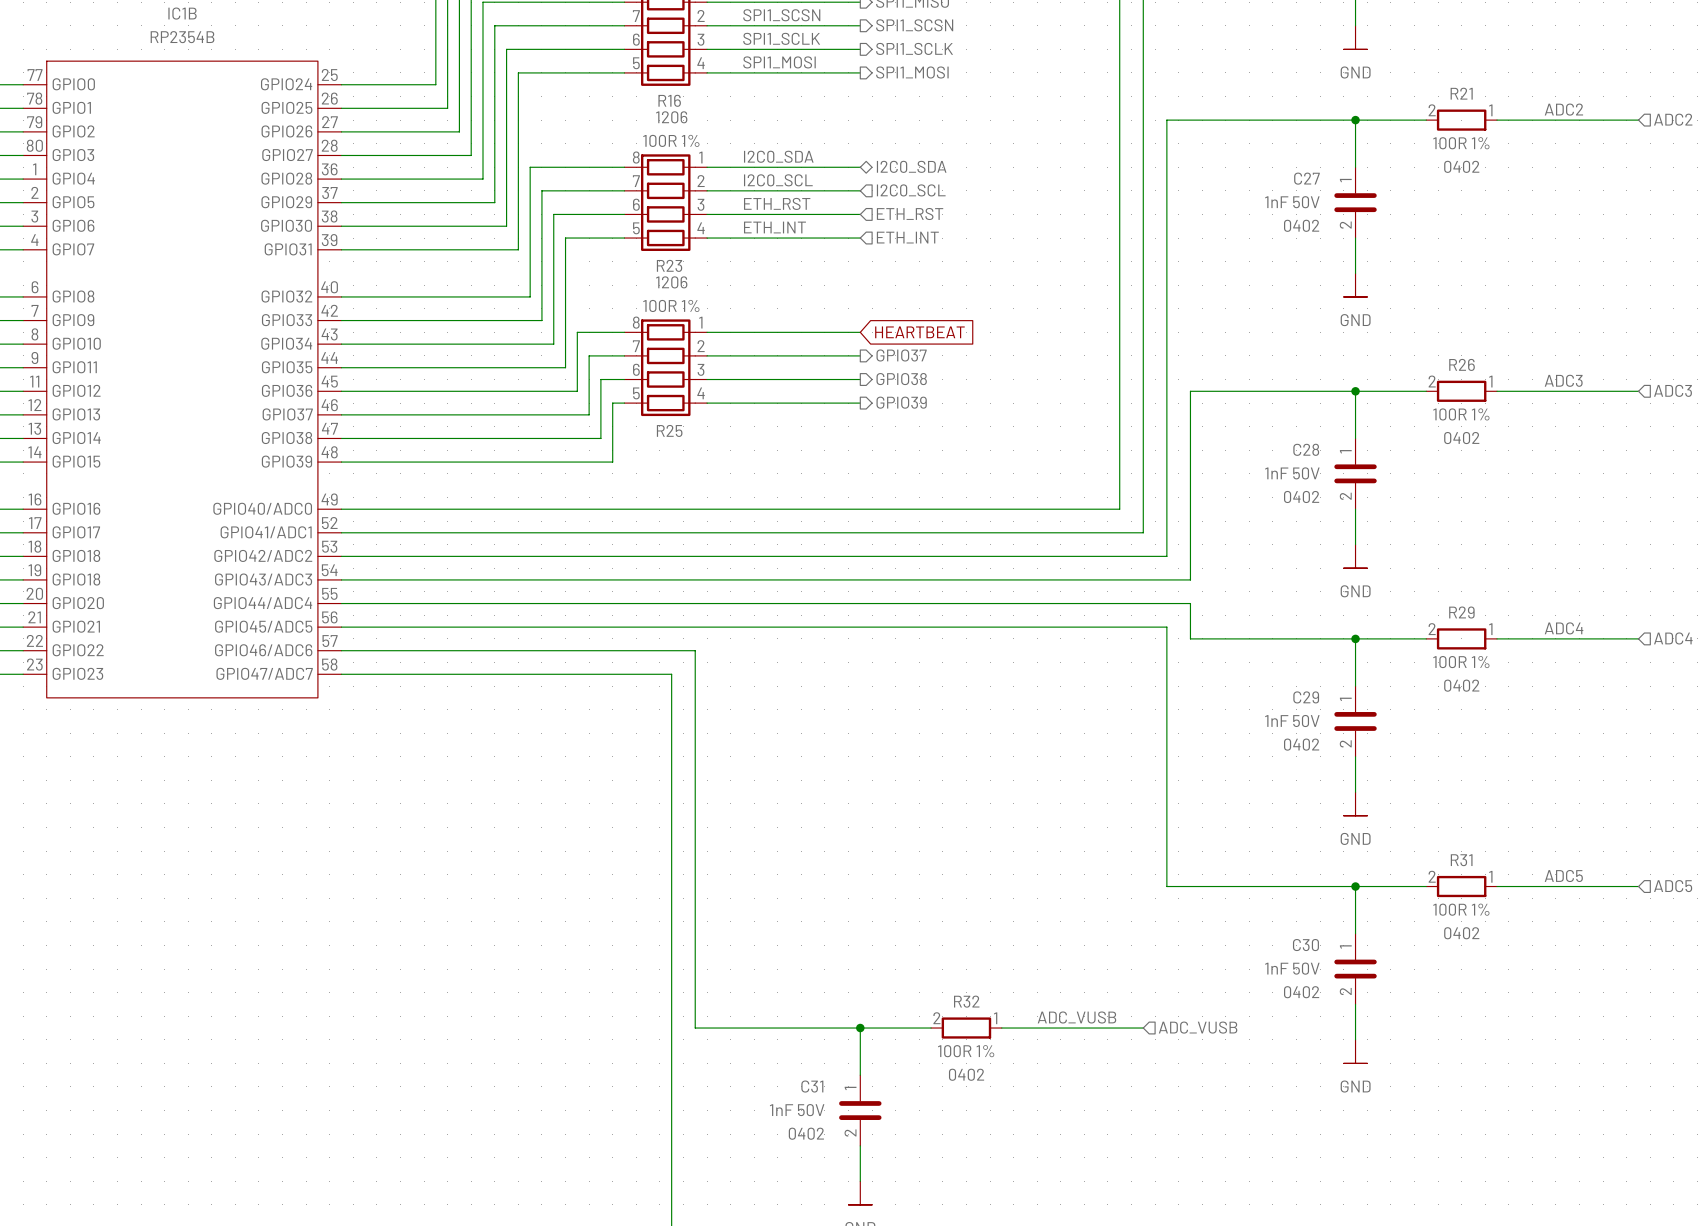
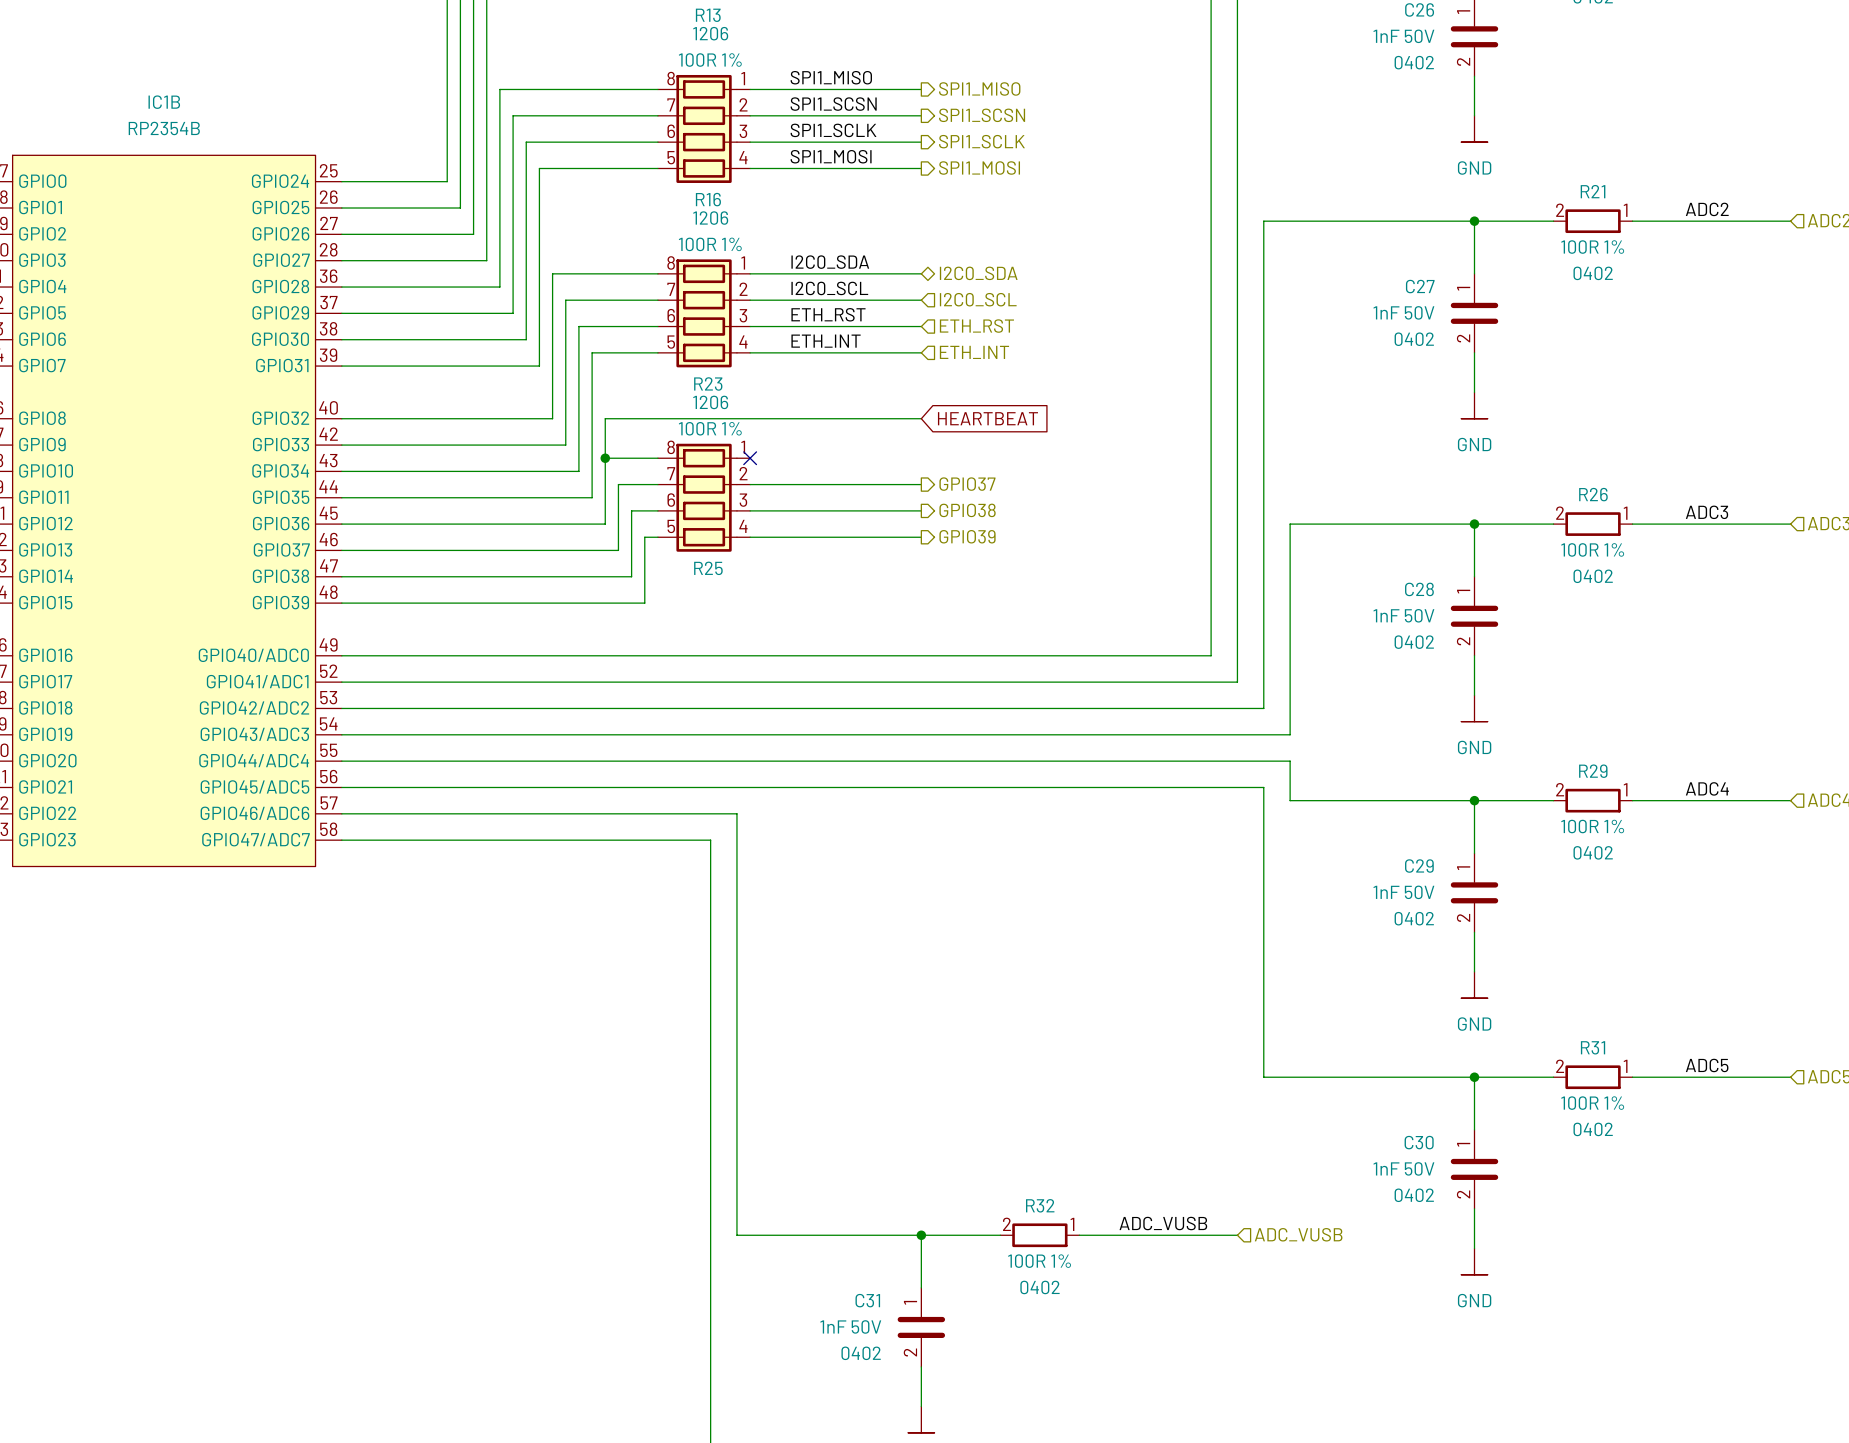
wire: none -> (921, 418) (605, 418) (605, 458)
junction: none -> (605, 458)
wire: (707, 332) (860, 332) -> none
no-connect mark: none -> (750, 458)
global label position: HEARTBEAT (919, 332) -> HEARTBEAT (987, 418)
IC1B pin name: GPIO18 (76, 579) -> GPIO19 (45, 734)

